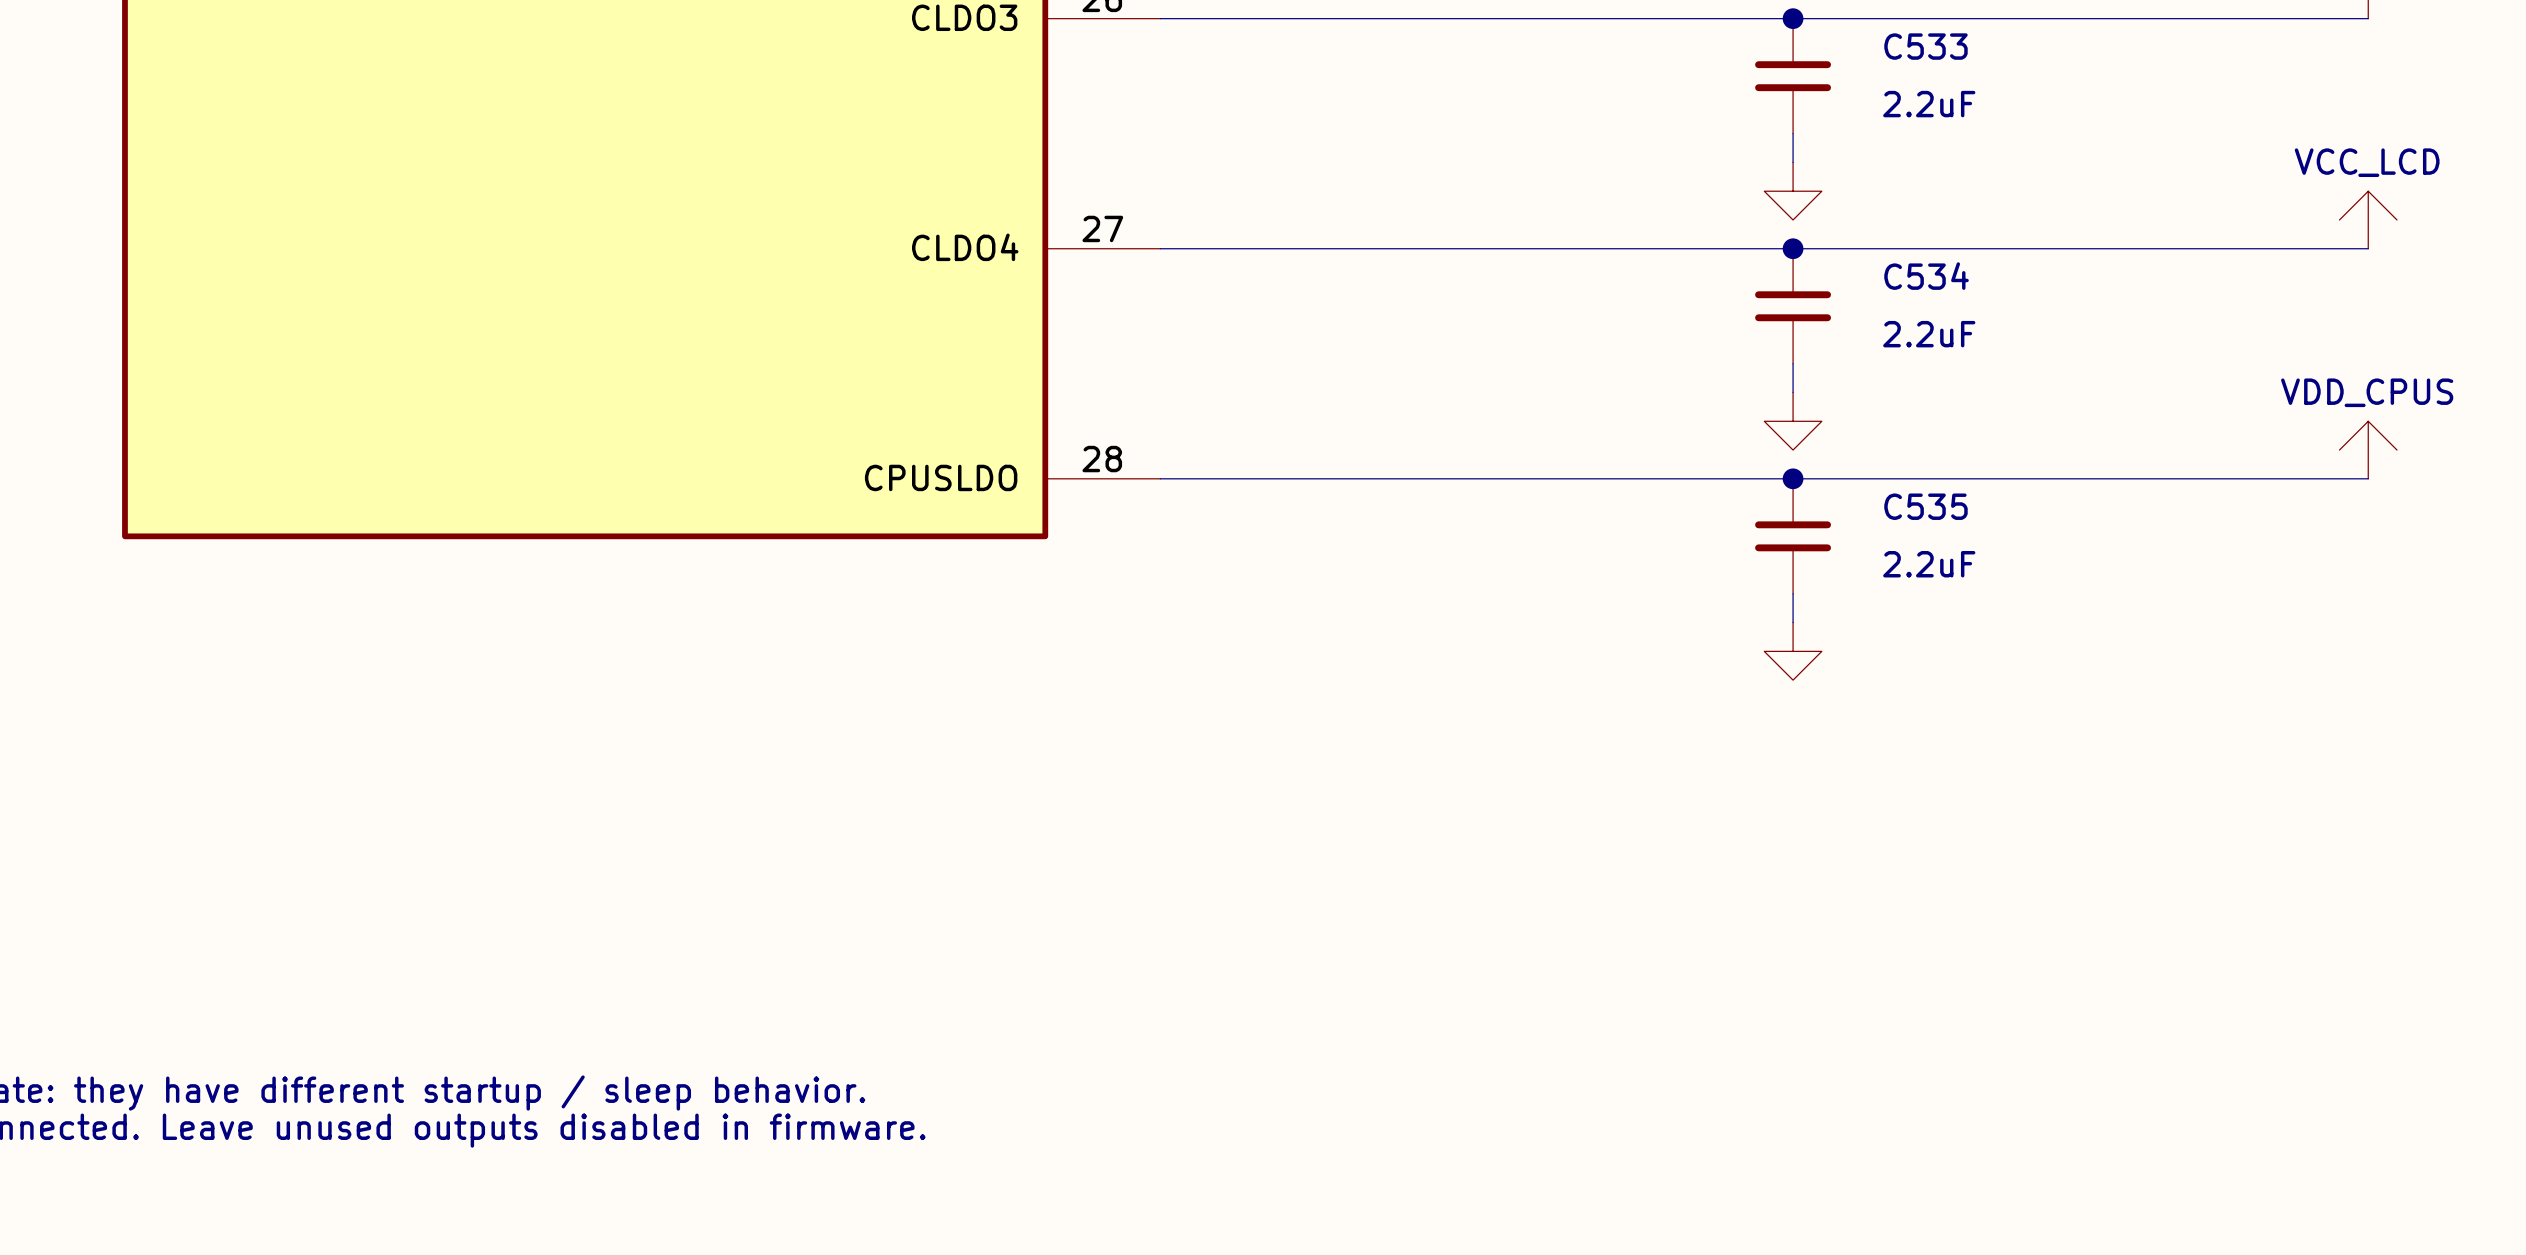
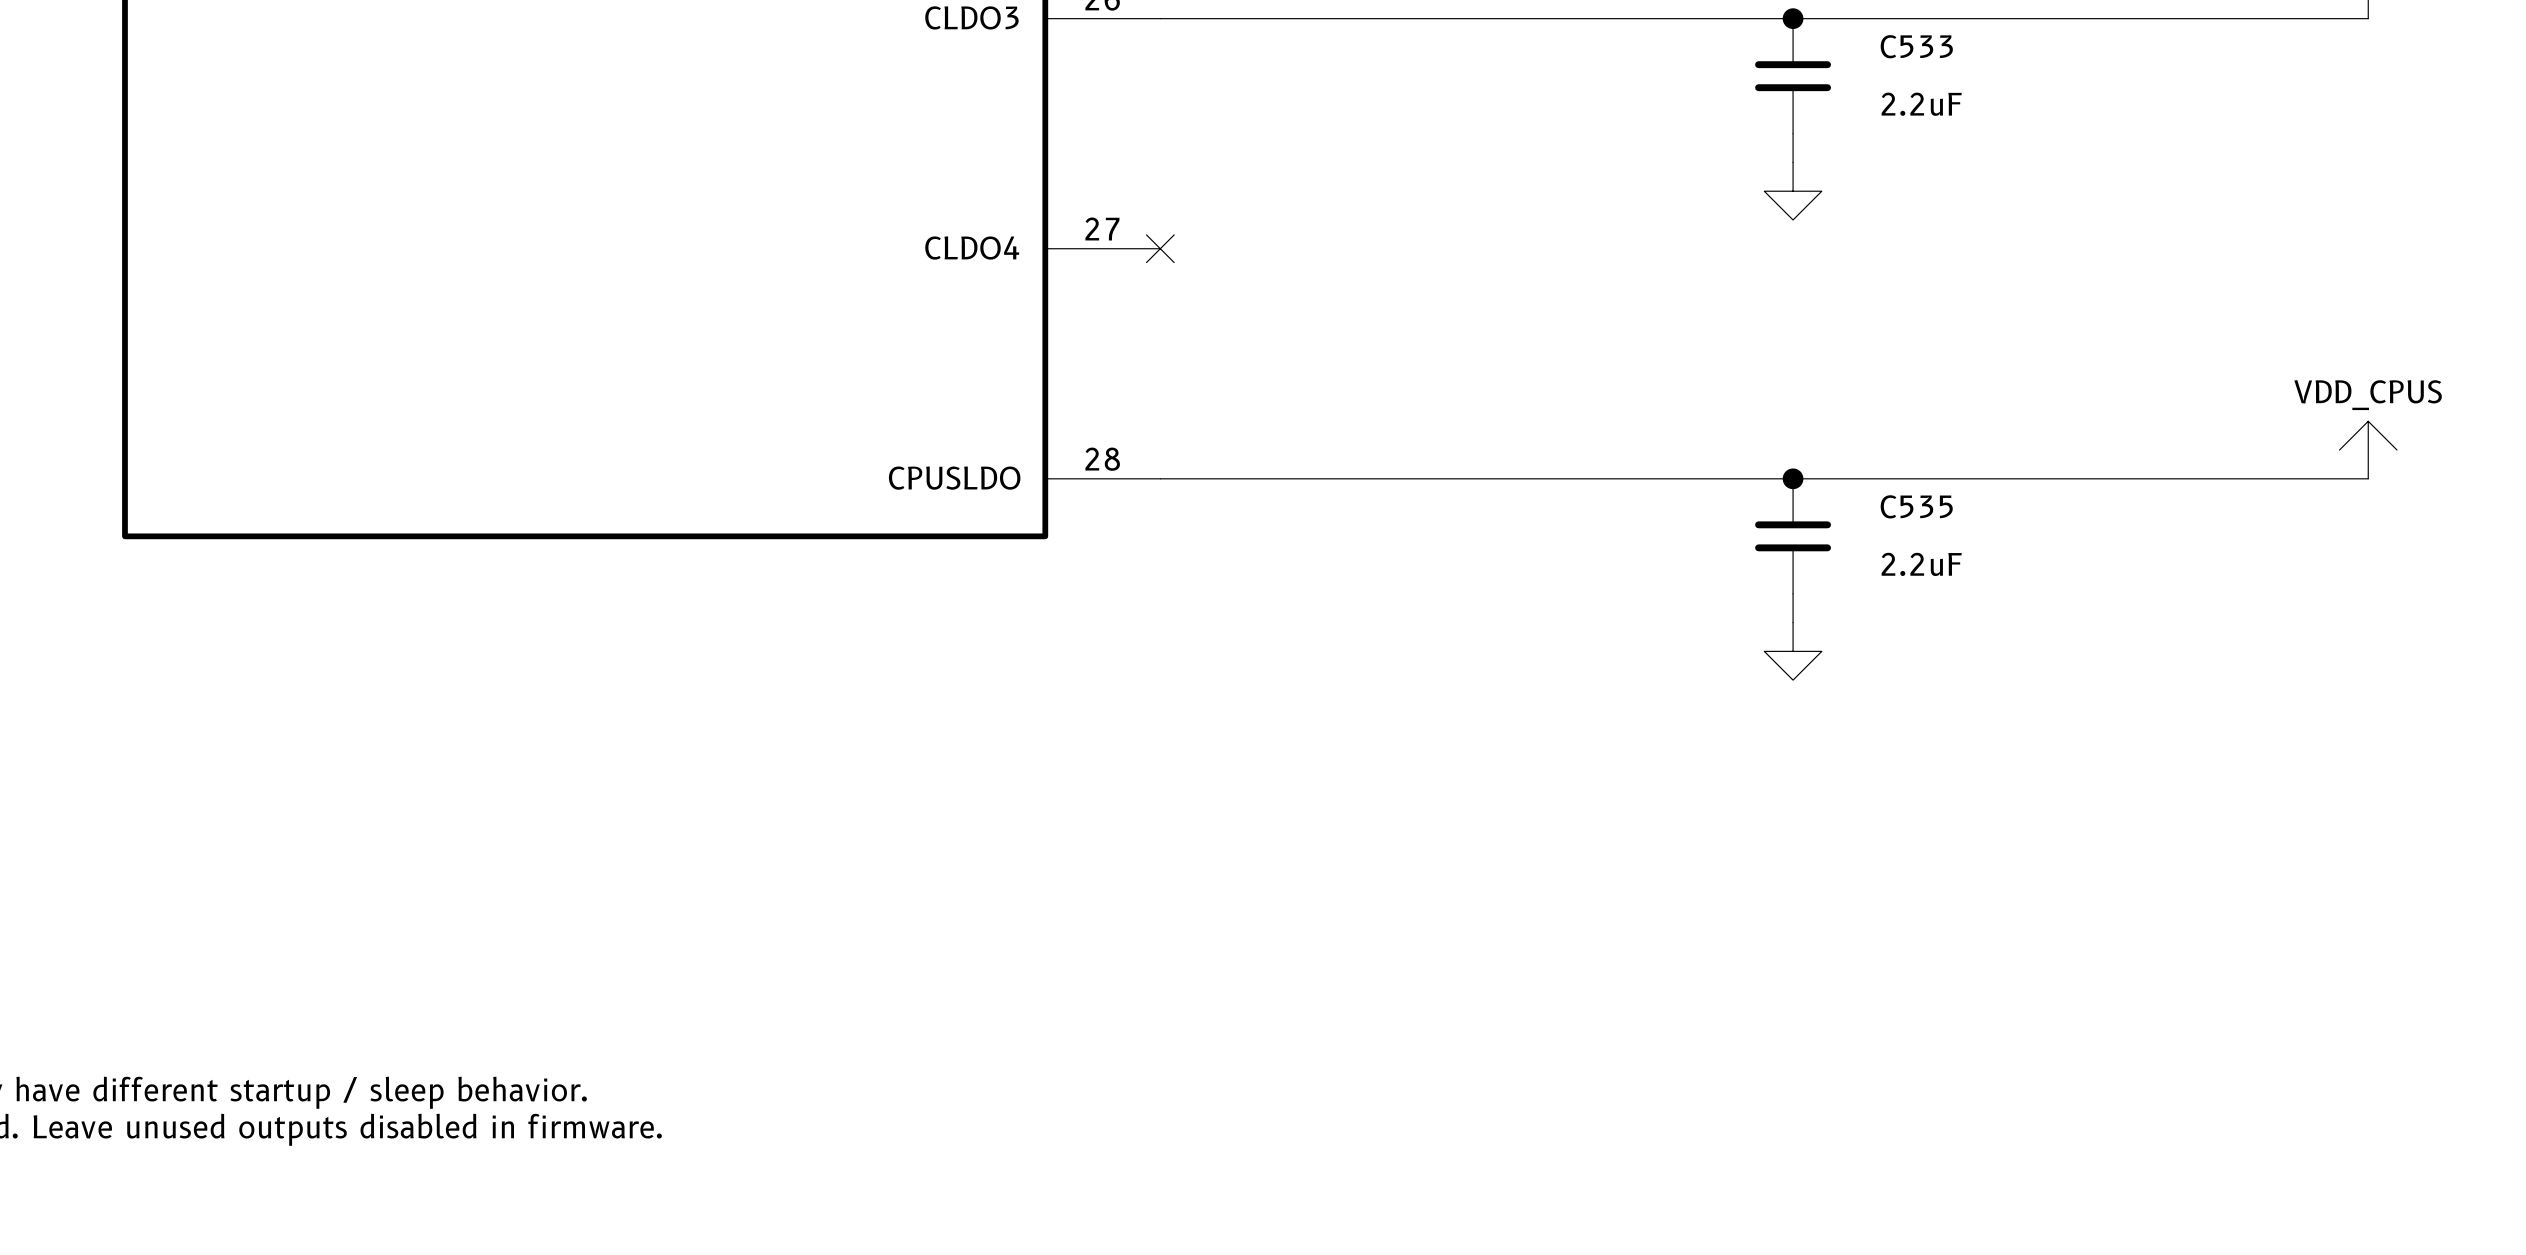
power symbol: VCC_LCD (2368, 219) -> none
wire: (1160, 248) (2368, 248) -> none
no-connect mark: none -> (1160, 248)
junction: (1793, 248) -> none
C534: 2.2uF (1793, 306) -> none
wire: (1793, 363) (1793, 392) -> none
power symbol: (1793, 421) -> none

